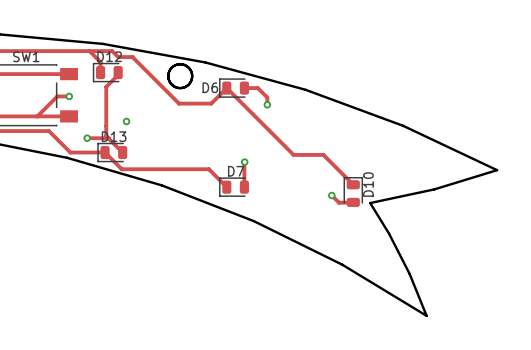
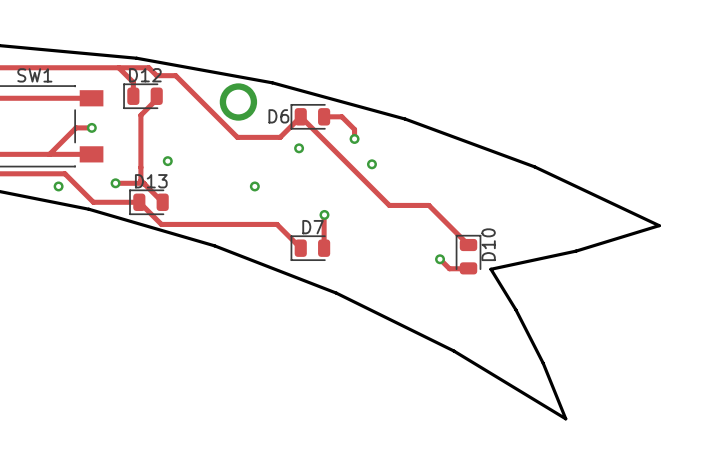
board edge: (179, 64) (188, 67) (192, 75) (189, 84) (180, 88) (172, 84) (168, 76) (171, 68) (179, 64) -> none
via: none -> (238, 102)
via: none -> (299, 148)
via: none -> (371, 164)
via: none -> (58, 186)
via: none -> (254, 186)

